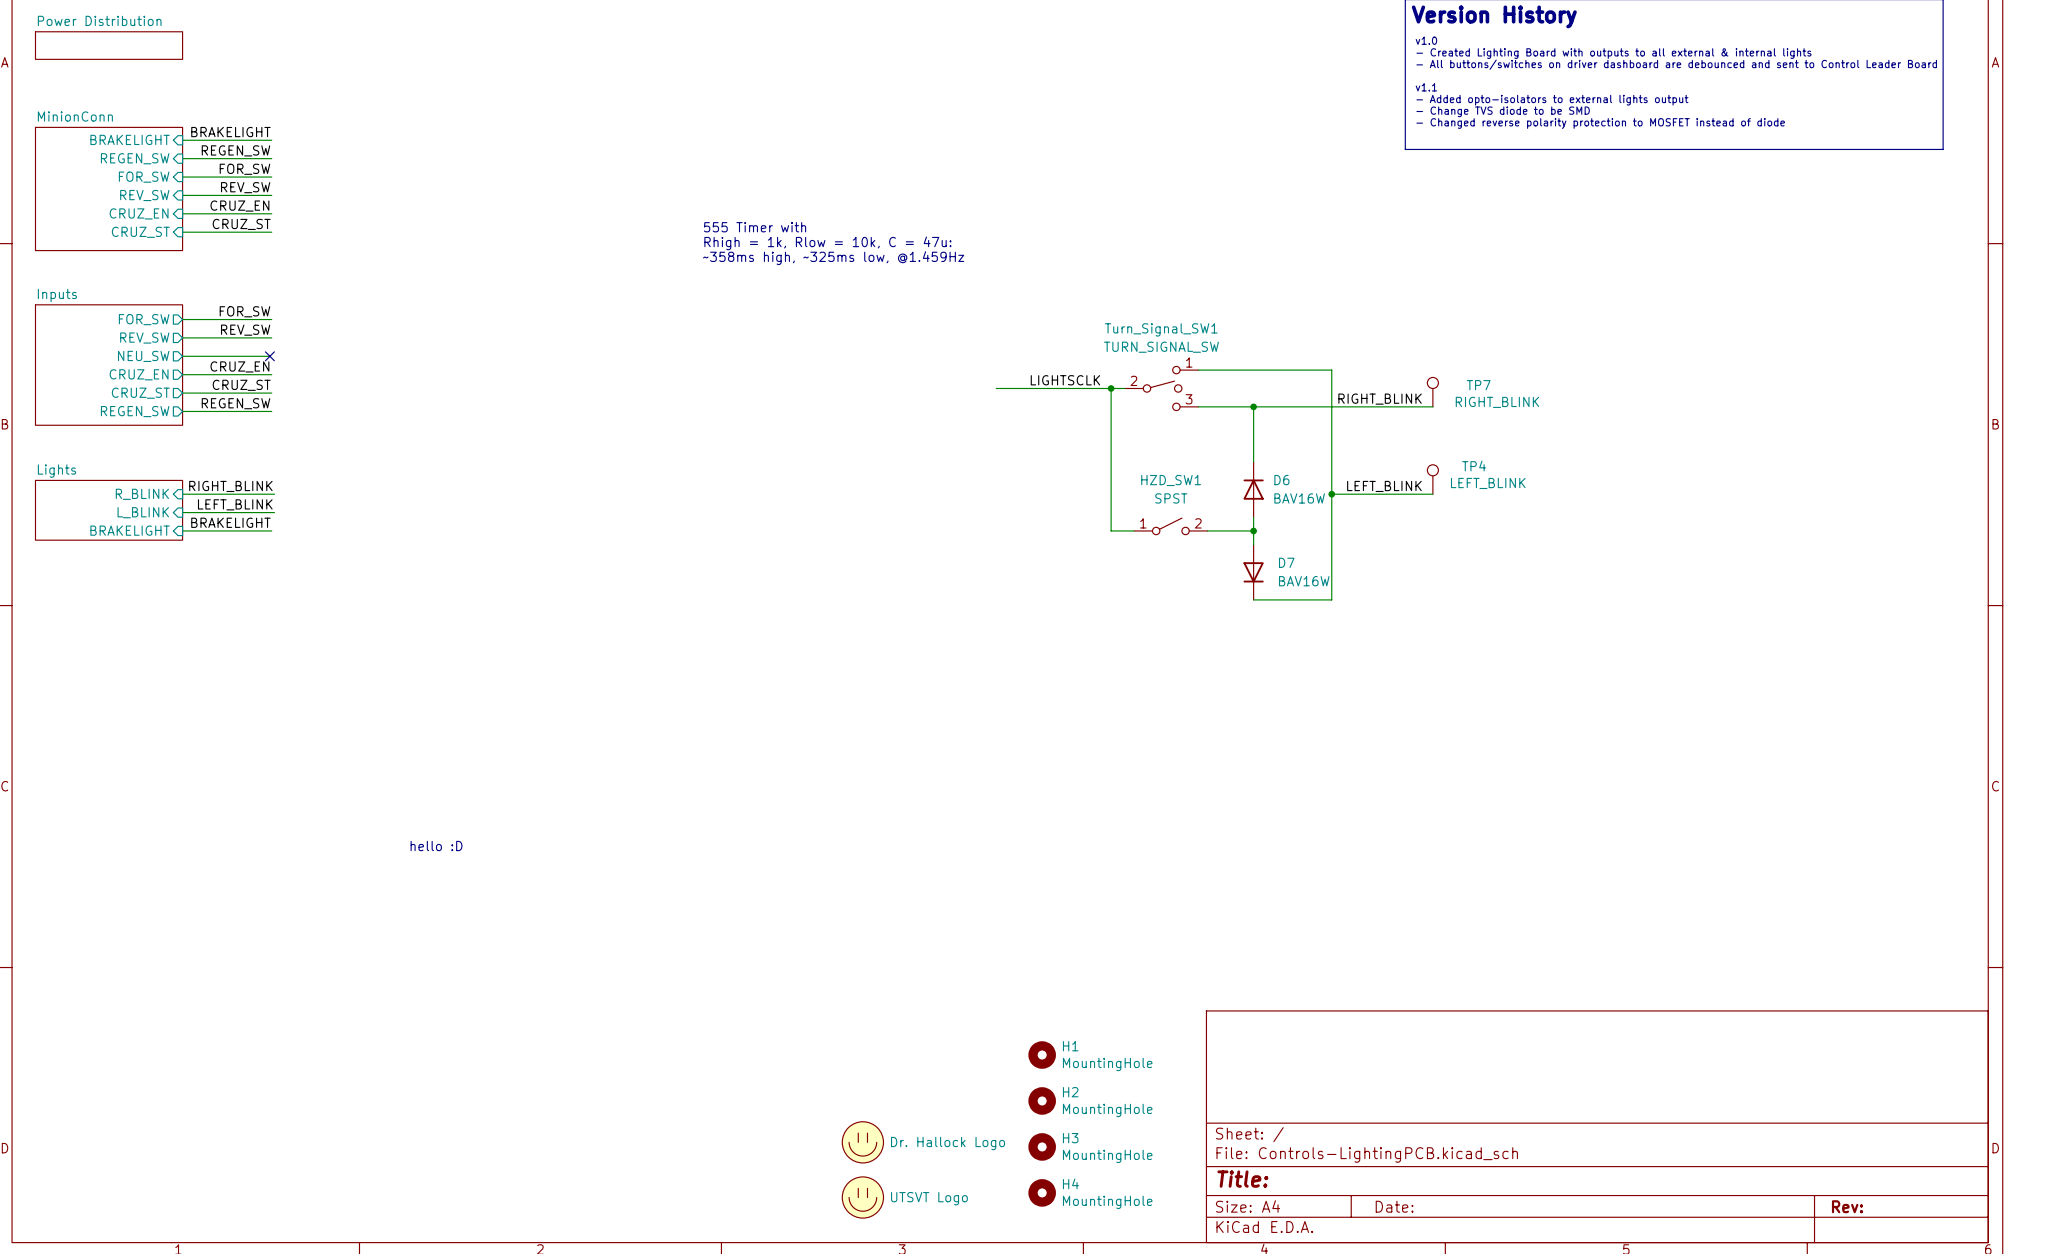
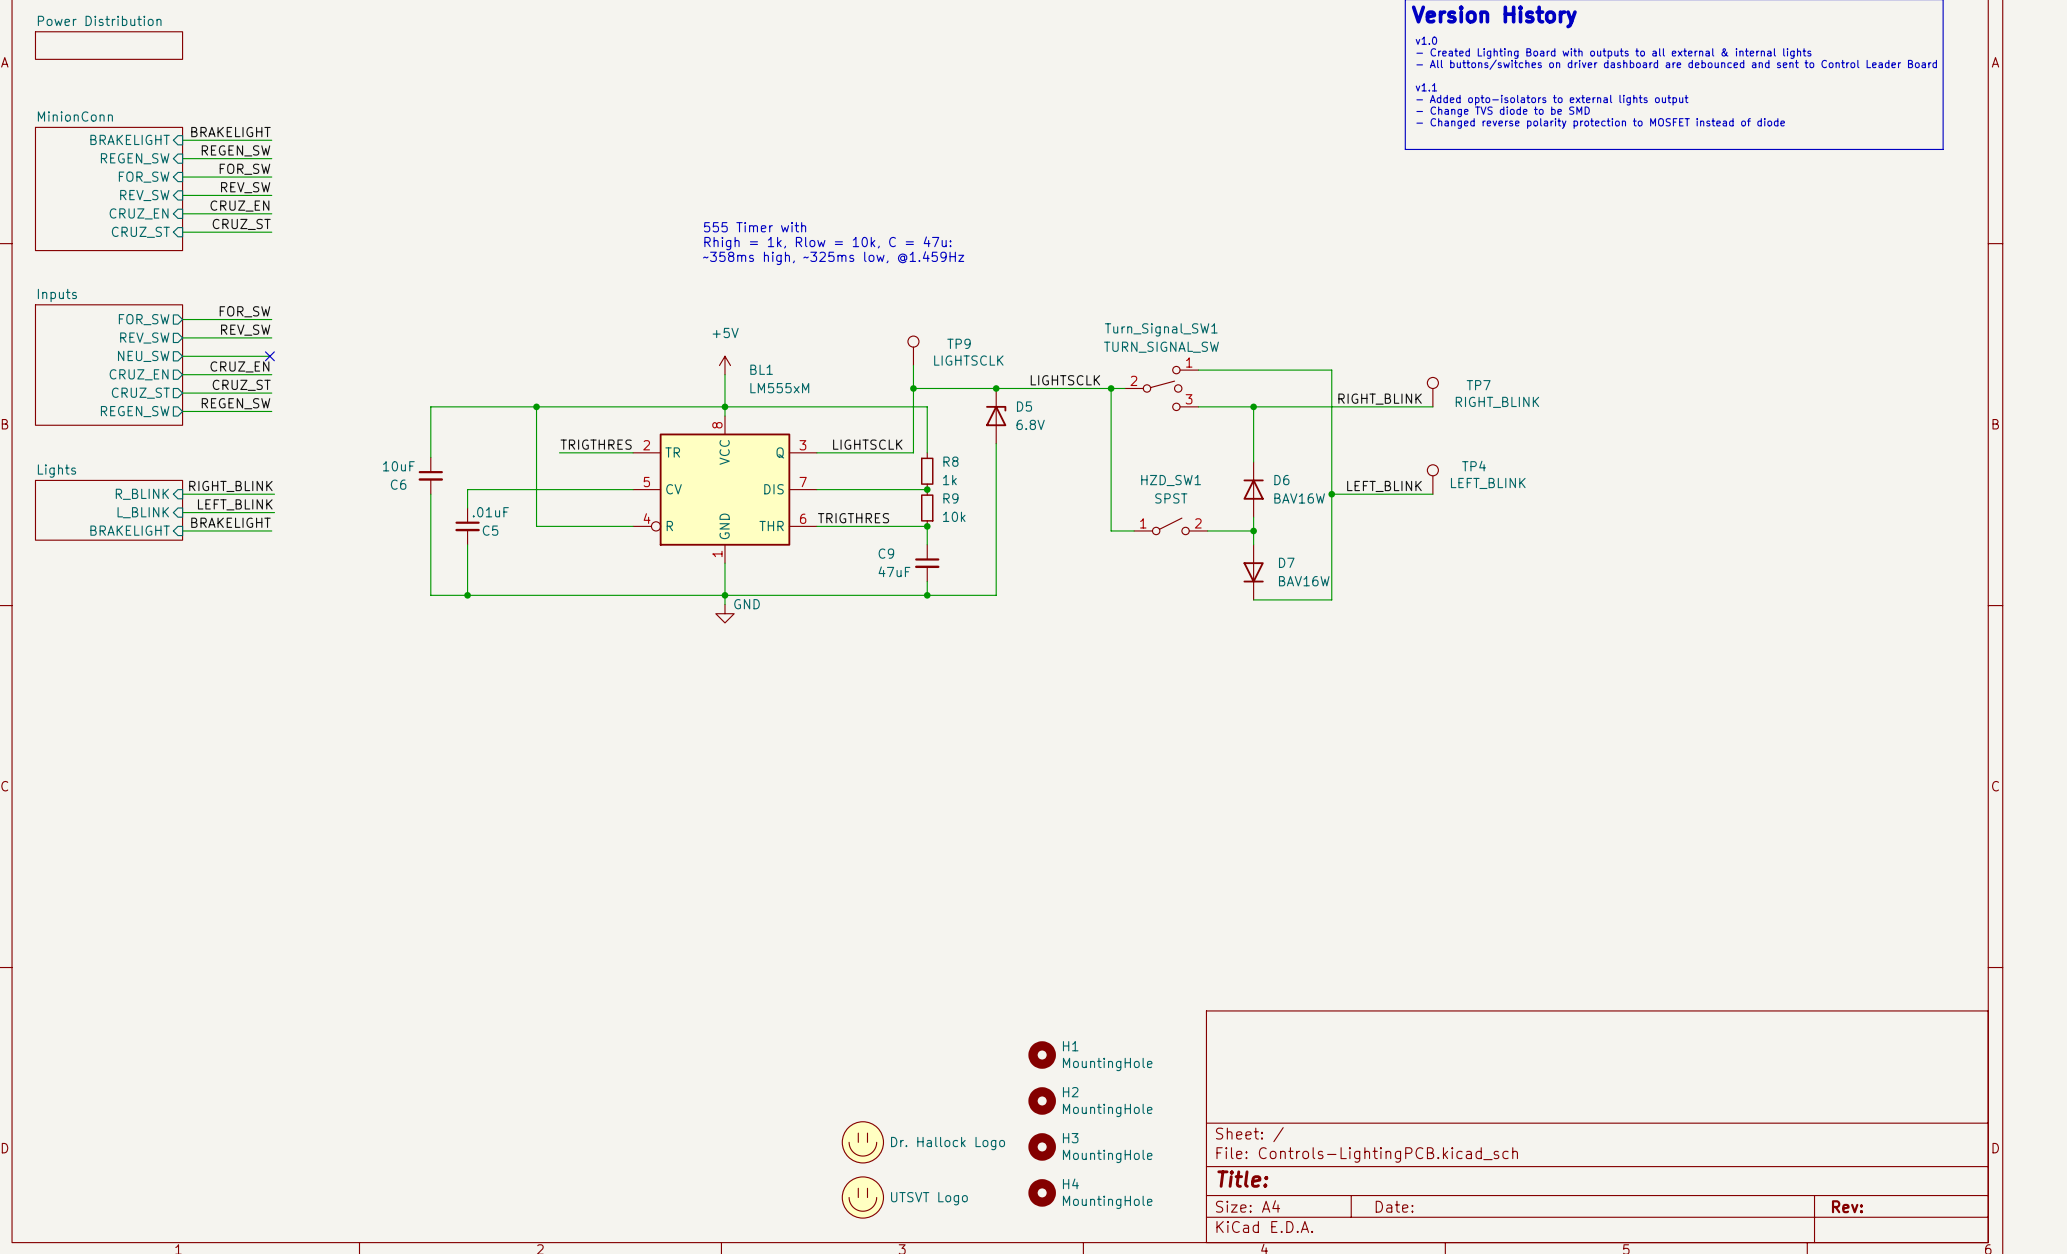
TP9: none -> LIGHTSCLK (913, 350)
power symbol: none -> +5V (724, 365)
wire: none -> (913, 365) (913, 452) (816, 452)
wire: none -> (724, 374) (724, 416)
wire: none -> (913, 388) (996, 388)
junction: none -> (913, 388)
junction: none -> (996, 388)
wire: none -> (536, 406) (536, 526) (633, 526)
junction: none -> (536, 406)
junction: none -> (724, 406)
D5: none -> 6.8V (996, 416)
wire: none -> (996, 443) (996, 595) (430, 595) (430, 494)
label: none -> TRIGTHRES (596, 444)
label: none -> LIGHTSCLK (867, 444)
wire: none -> (559, 452) (633, 452)
wire: none -> (927, 452) (927, 406) (430, 406) (430, 457)
R8: none -> 1k (927, 471)
C6: none -> 10uF (430, 475)
wire: none -> (633, 489) (467, 489) (467, 507)
BL1: none -> LM555xM (724, 489)
wire: none -> (816, 489) (927, 489)
junction: none -> (927, 489)
R9: none -> 10k (927, 507)
label: none -> TRIGTHRES (853, 518)
C5: none -> .01uF (467, 526)
wire: none -> (816, 526) (927, 526) (927, 544)
junction: none -> (927, 526)
wire: none -> (467, 544) (467, 595)
wire: none -> (724, 563) (724, 604)
C9: none -> 47uF (927, 563)
wire: none -> (927, 581) (927, 595)
junction: none -> (467, 595)
junction: none -> (724, 595)
junction: none -> (927, 595)
power symbol: none -> GND (724, 613)
text: hello :D (436, 846) -> none

